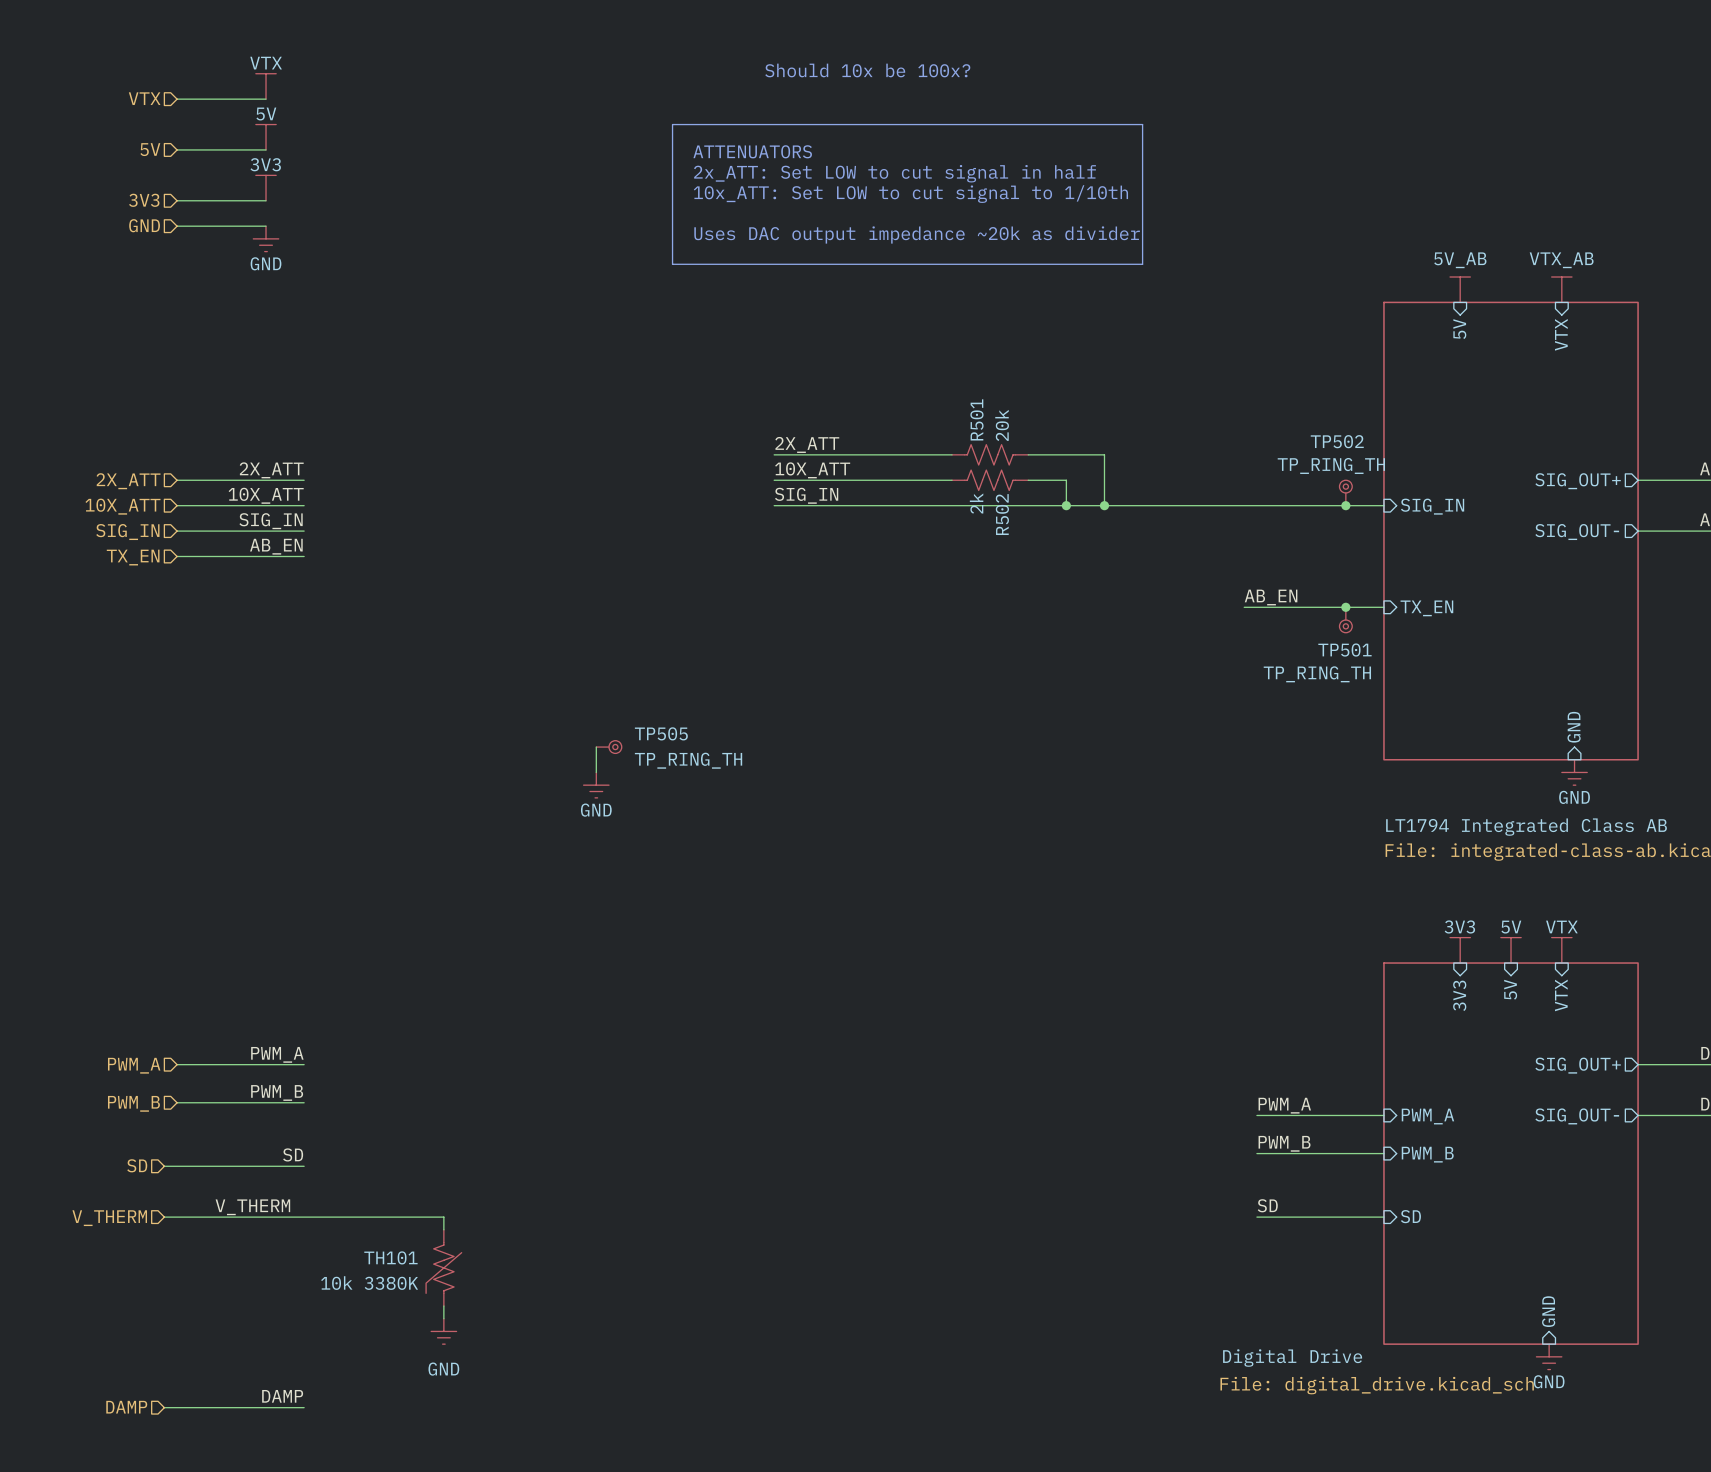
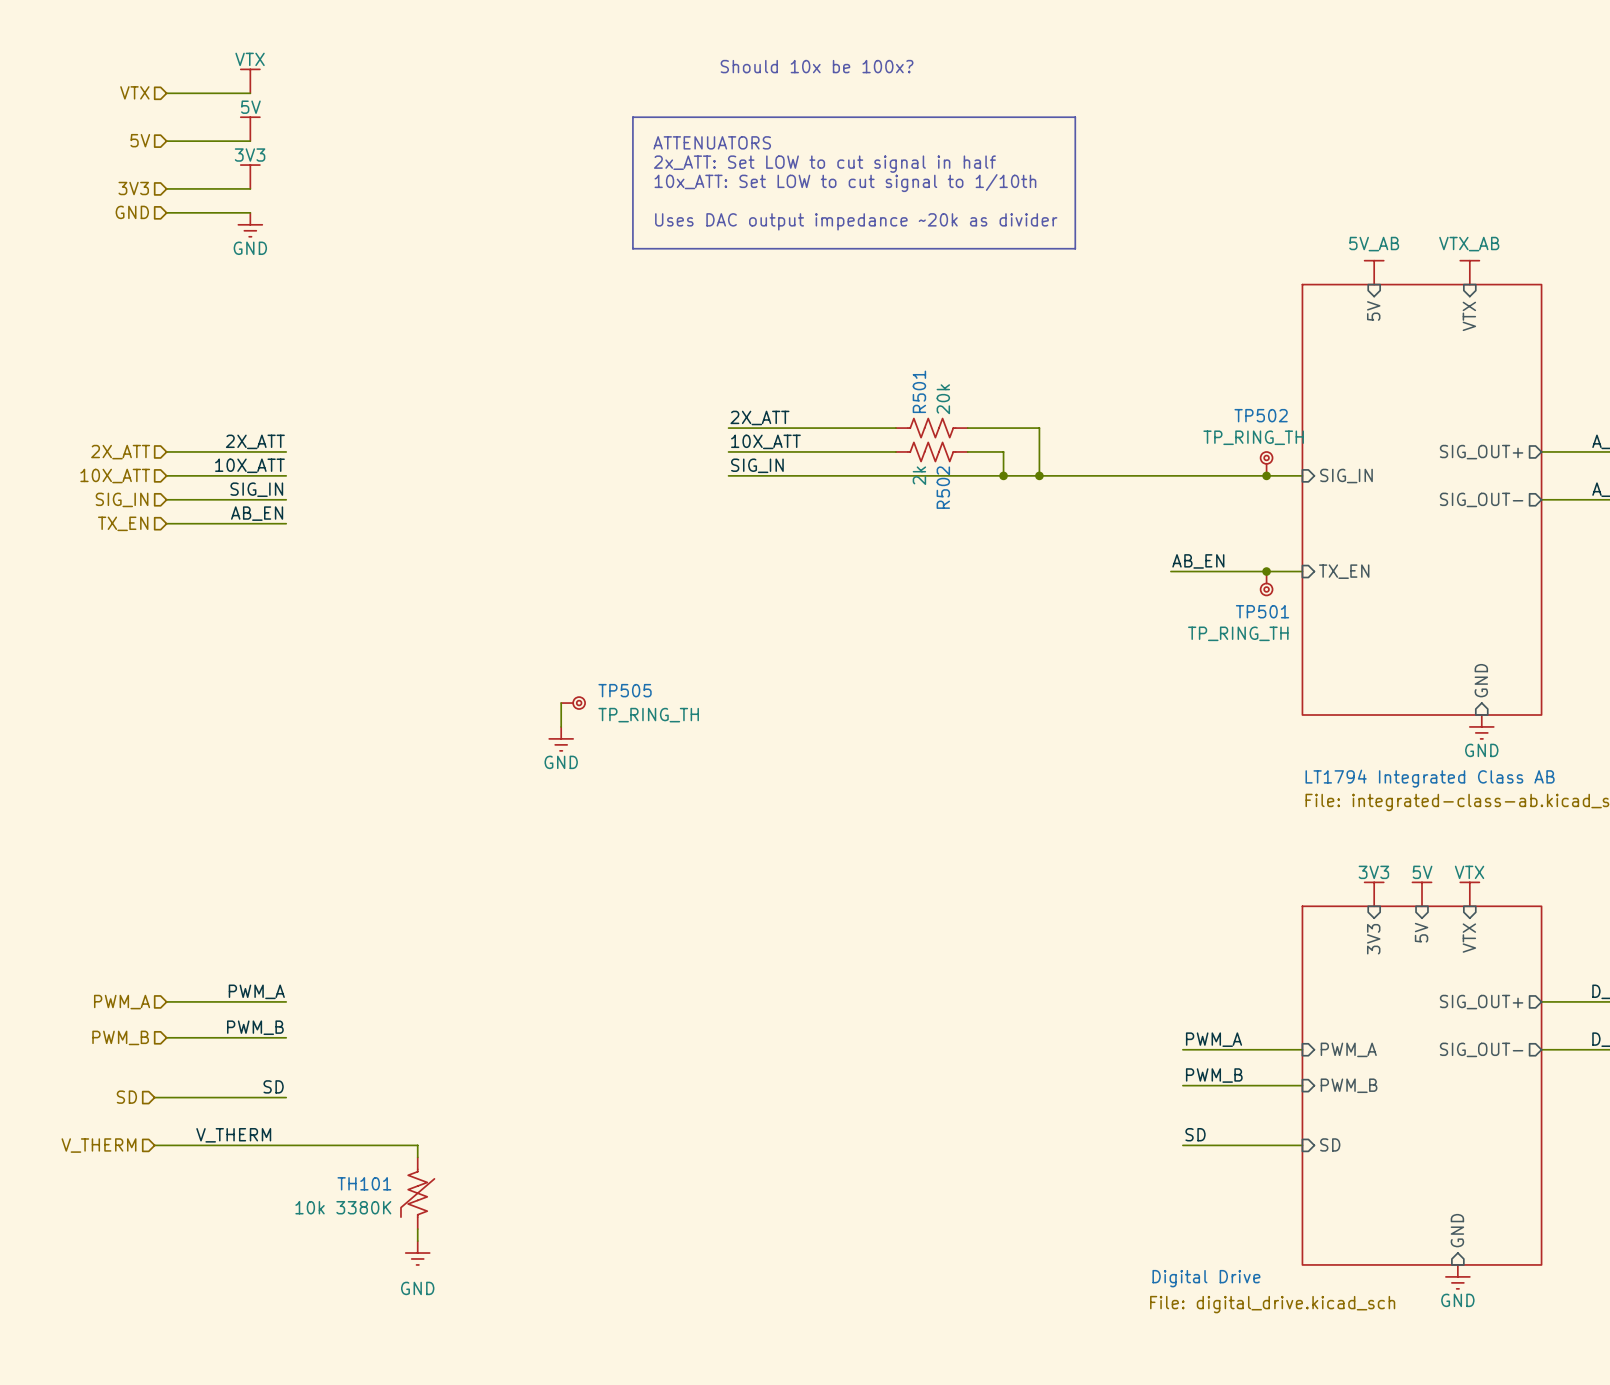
label: DAMP (282, 1396) -> none
hierarchical label: DAMP (126, 1407) -> none
wire: (164, 1407) (304, 1407) -> none

